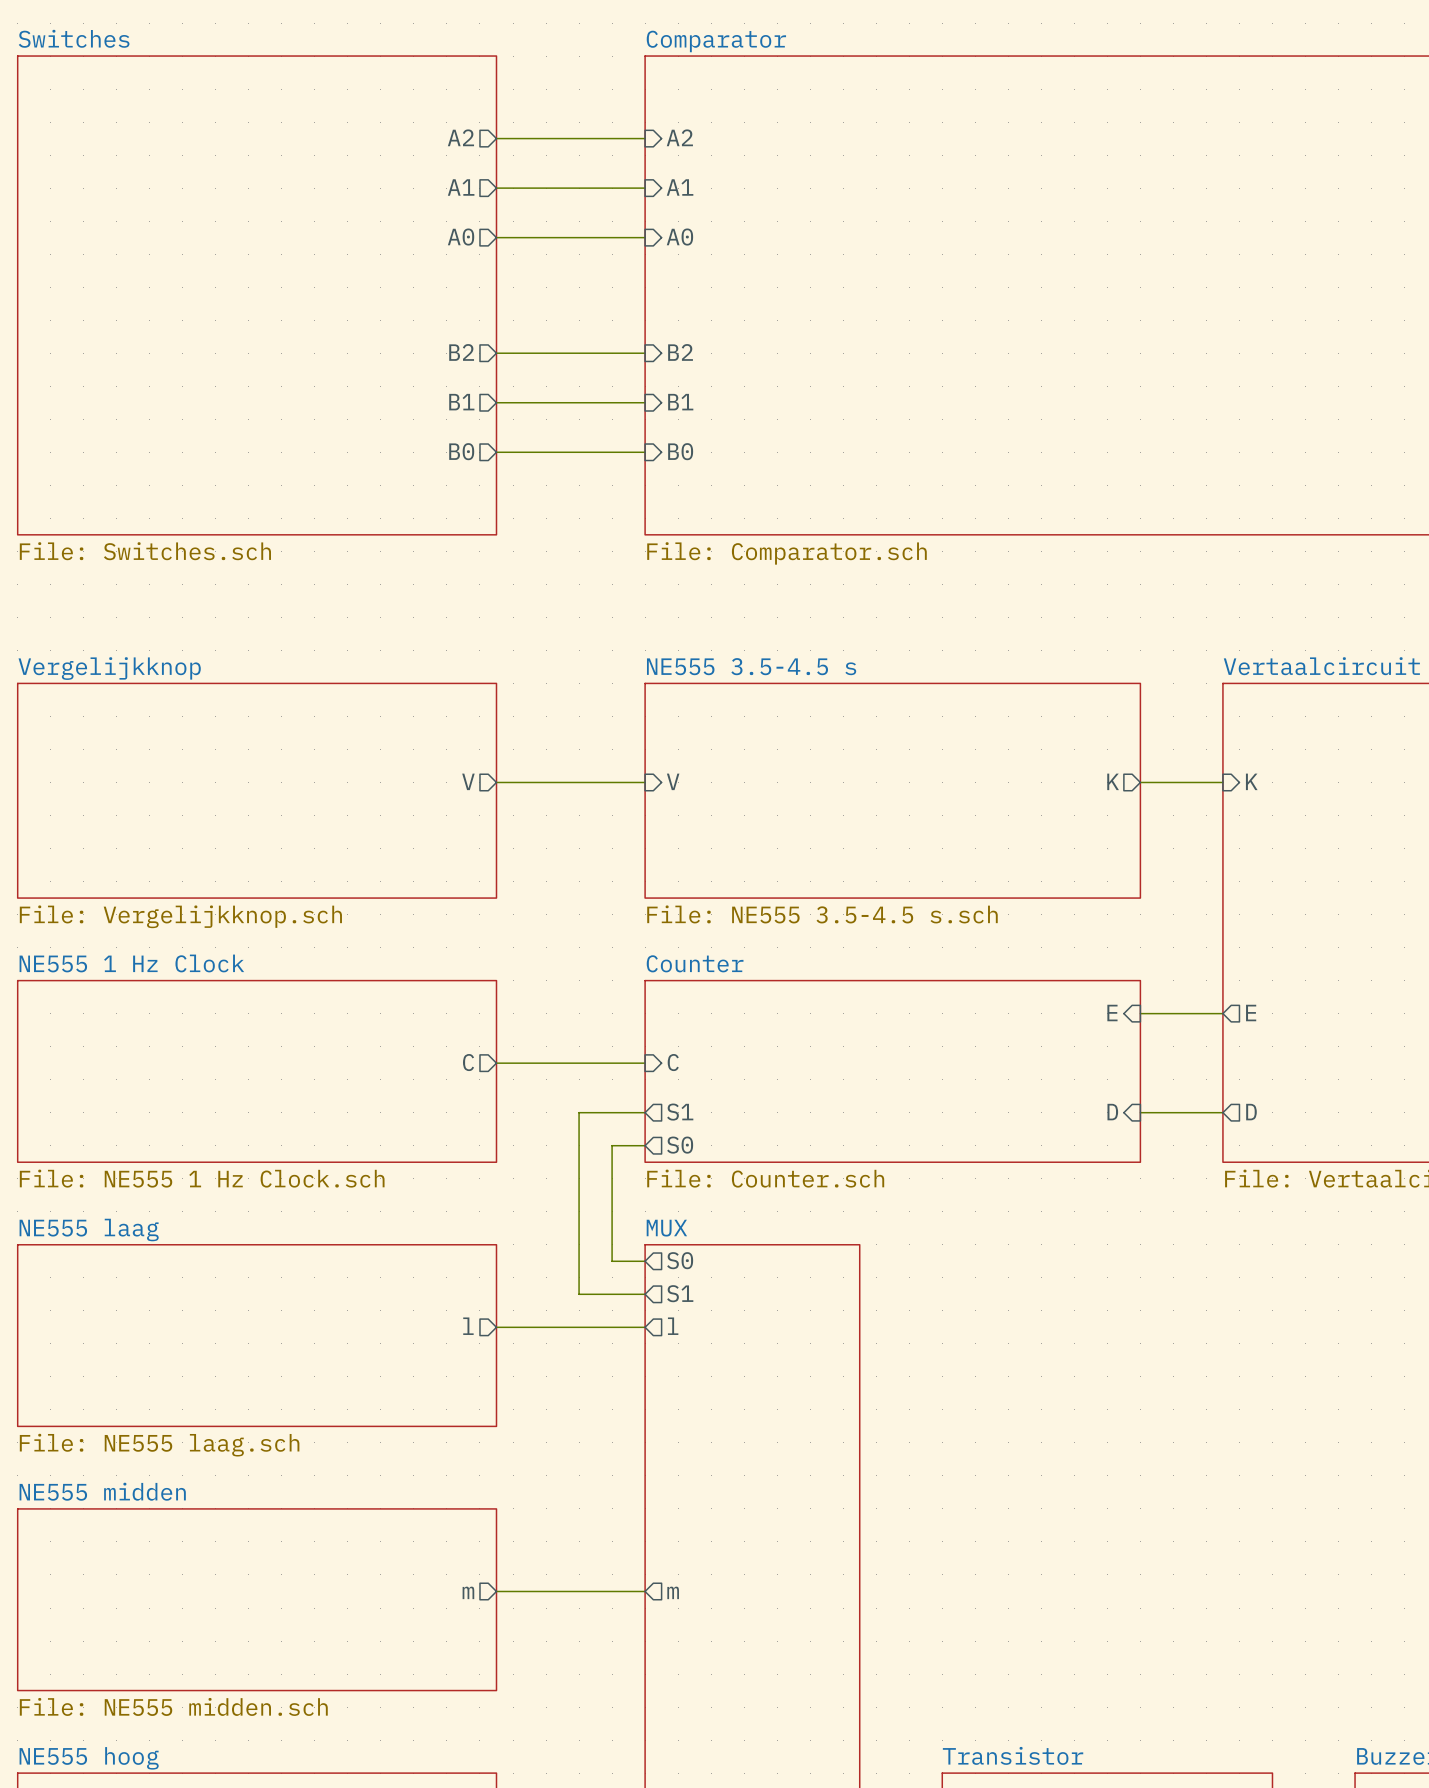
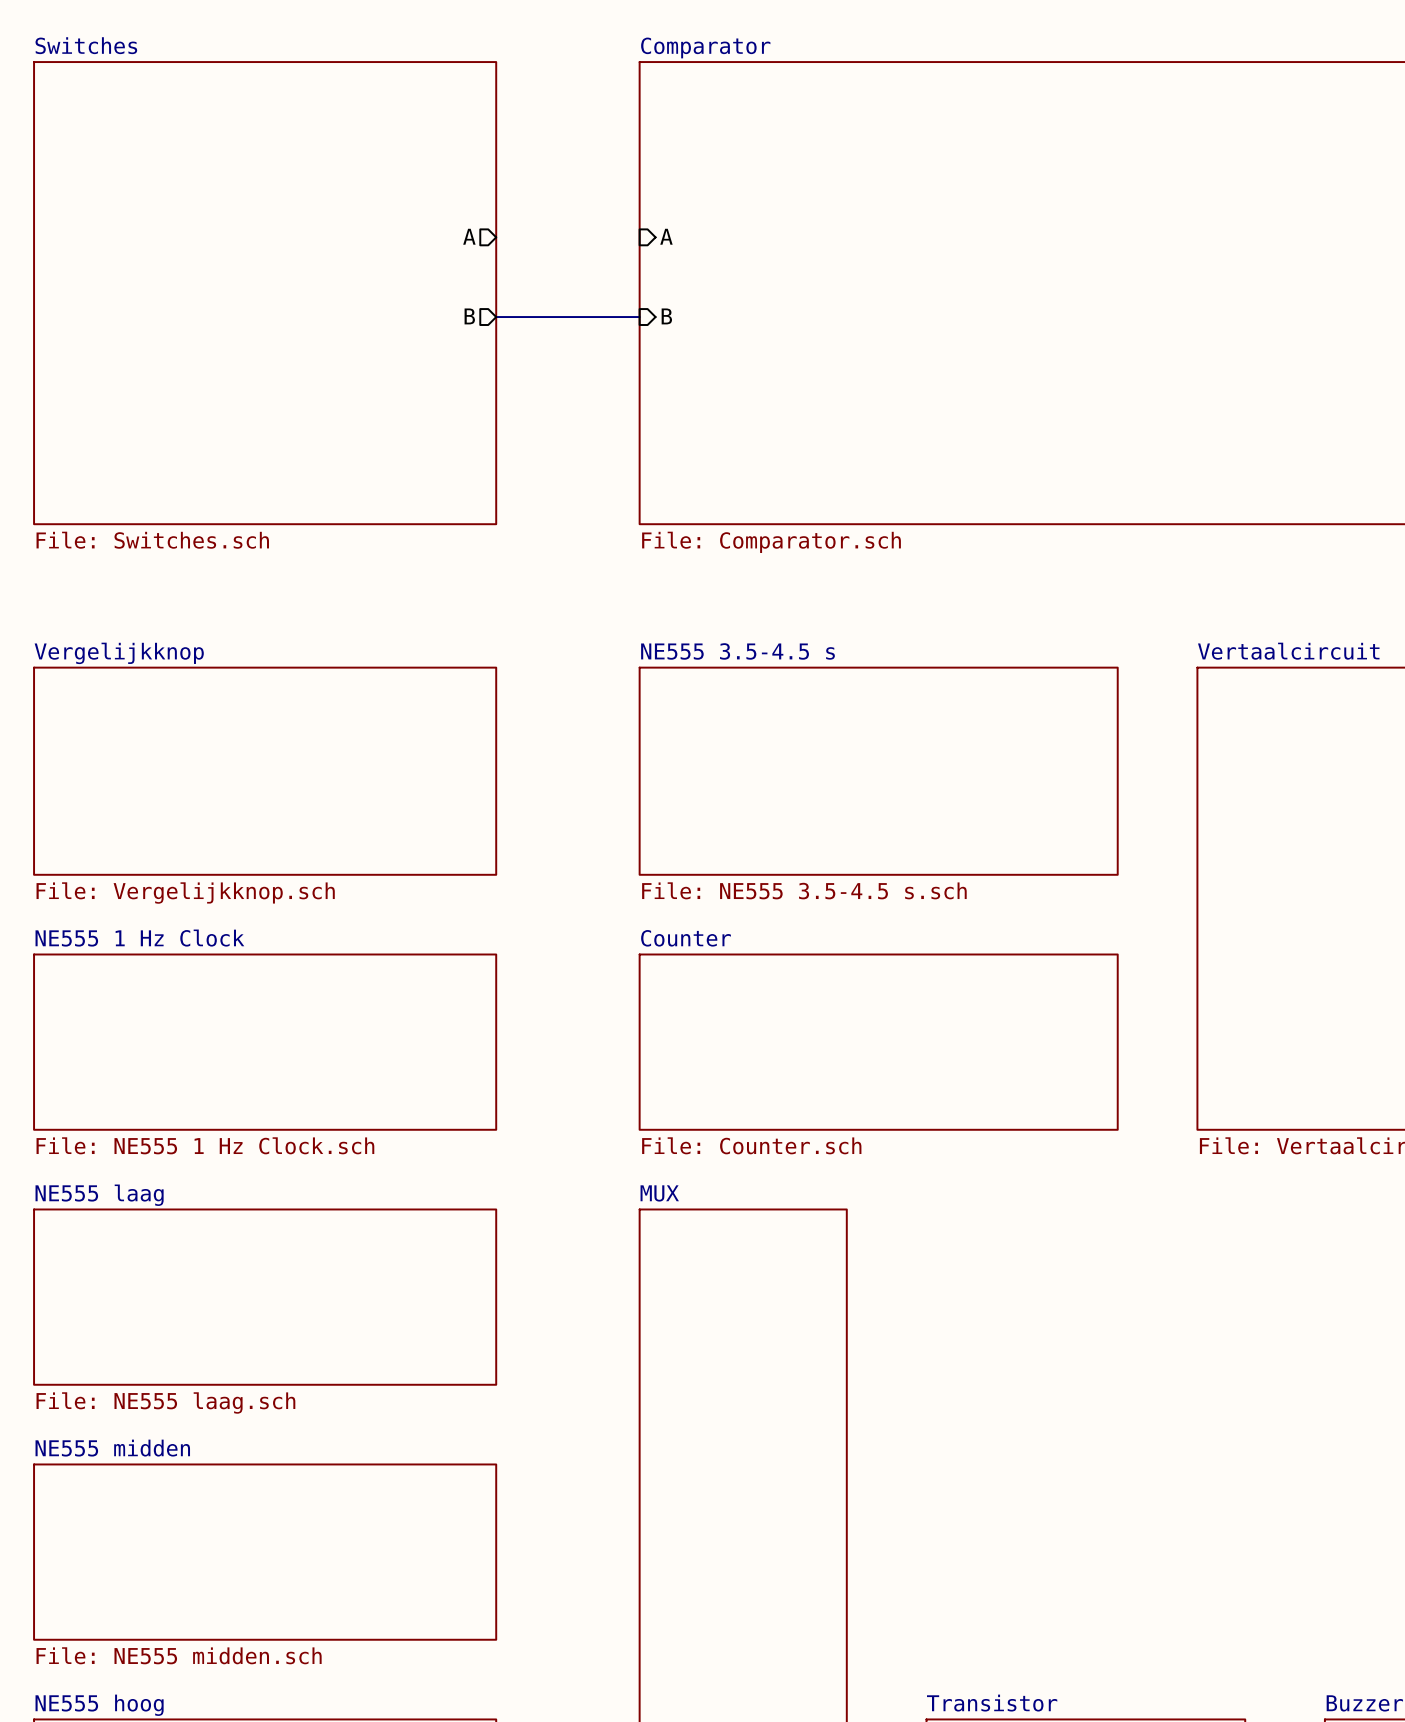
sheet pin: A2 (460, 137) -> none
sheet pin: A2 (679, 137) -> none
wire: (496, 138) (645, 138) -> none
sheet pin: A1 (461, 187) -> none
sheet pin: A1 (680, 187) -> none
wire: (496, 188) (645, 188) -> none
sheet pin: A0 (461, 237) -> A (469, 236)
wire: (496, 237) (645, 237) -> none
sheet pin: A0 (679, 237) -> A (666, 236)
bus: none -> (496, 317) (639, 317)
sheet pin: B2 (461, 352) -> B (469, 316)
sheet pin: B2 (680, 352) -> B (666, 316)
wire: (496, 353) (645, 353) -> none
sheet pin: B1 (461, 402) -> none
wire: (496, 402) (645, 402) -> none
sheet pin: B1 (680, 402) -> none
sheet pin: B0 (461, 451) -> none
sheet pin: B0 (680, 451) -> none
wire: (496, 452) (645, 452) -> none
sheet pin: V (468, 781) -> none
sheet pin: V (673, 781) -> none
sheet pin: K (1113, 781) -> none
sheet pin: K (1251, 781) -> none
wire: (496, 782) (645, 782) -> none
wire: (1140, 782) (1222, 782) -> none
sheet pin: E (1112, 1013) -> none
wire: (1140, 1013) (1222, 1013) -> none
sheet pin: E (1251, 1013) -> none
sheet pin: C (468, 1062) -> none
sheet pin: C (673, 1062) -> none
wire: (496, 1063) (645, 1063) -> none
wire: (645, 1112) (579, 1112) (579, 1294) (645, 1294) -> none
sheet pin: S1 (680, 1112) -> none
sheet pin: D (1112, 1112) -> none
wire: (1140, 1112) (1222, 1112) -> none
sheet pin: D (1251, 1112) -> none
wire: (645, 1145) (612, 1145) (612, 1261) (645, 1261) -> none
sheet pin: S0 (680, 1145) -> none
sheet pin: S0 (680, 1260) -> none
sheet pin: S1 (680, 1293) -> none
sheet pin: l (468, 1326) -> none
sheet pin: l (673, 1326) -> none
wire: (496, 1327) (645, 1327) -> none
wire: (496, 1591) (645, 1591) -> none
sheet pin: m (468, 1592) -> none
sheet pin: m (673, 1592) -> none

